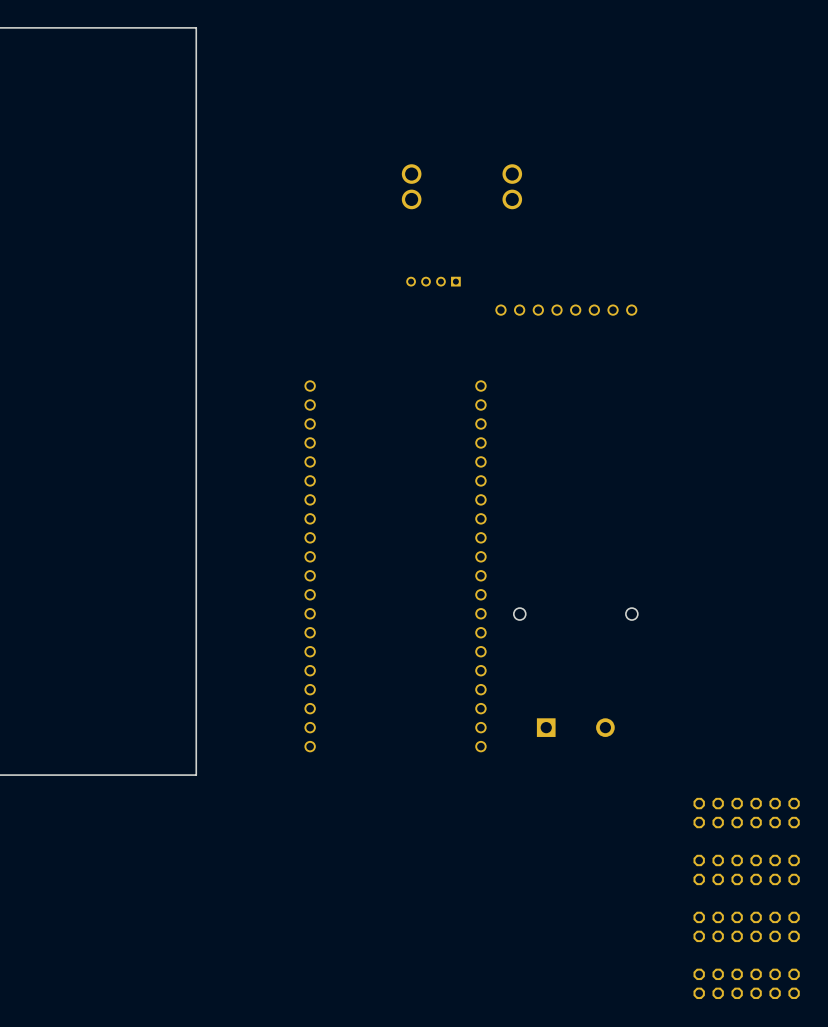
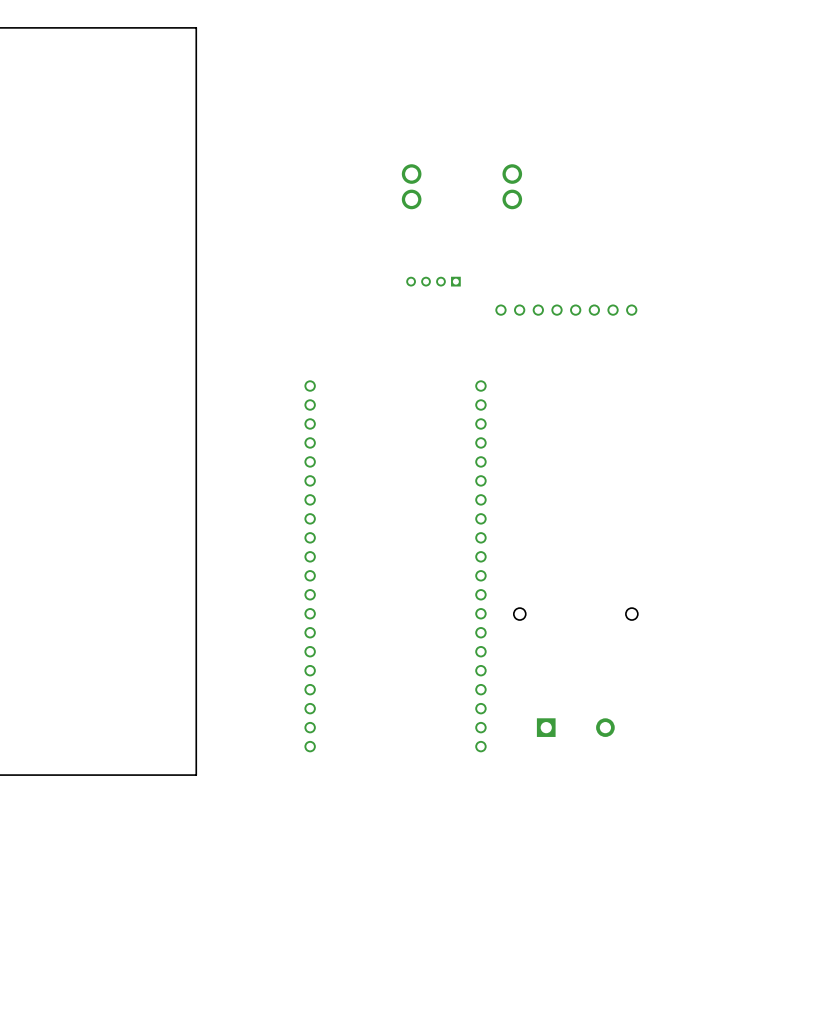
part: (746, 813) -> none
part: (746, 869) -> none
part: (746, 926) -> none
part: (746, 983) -> none

